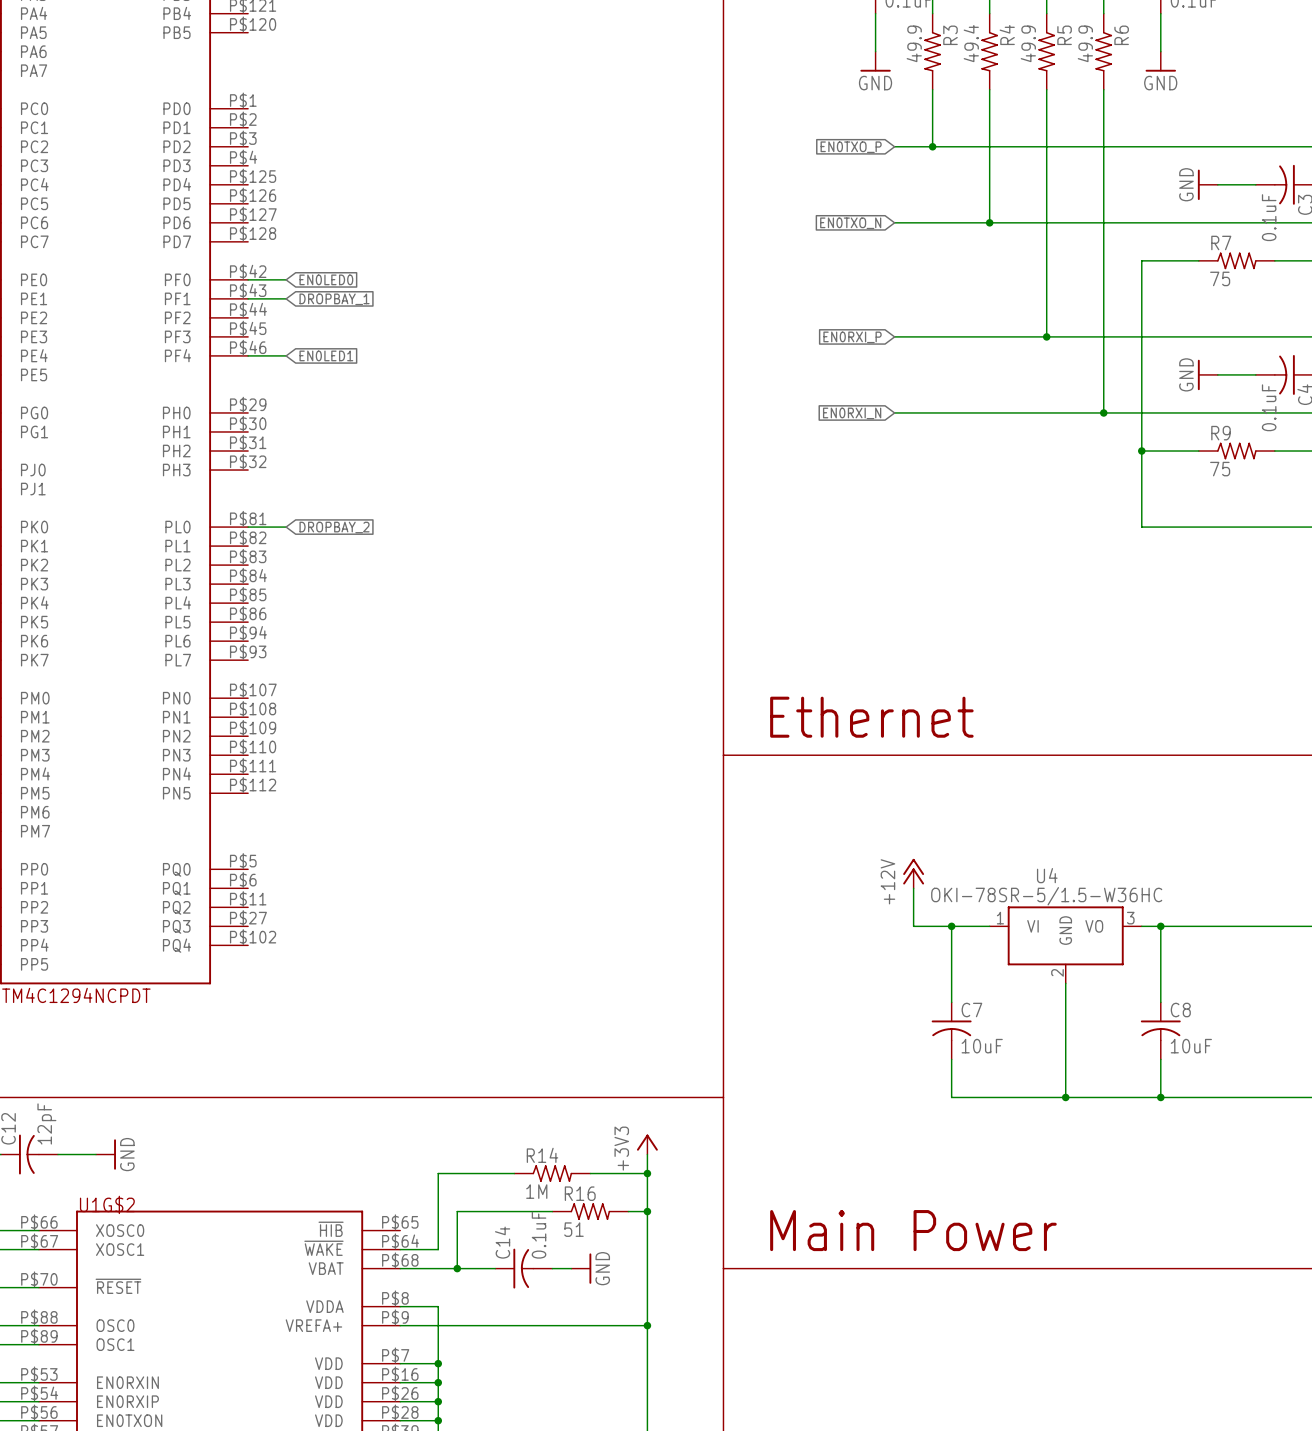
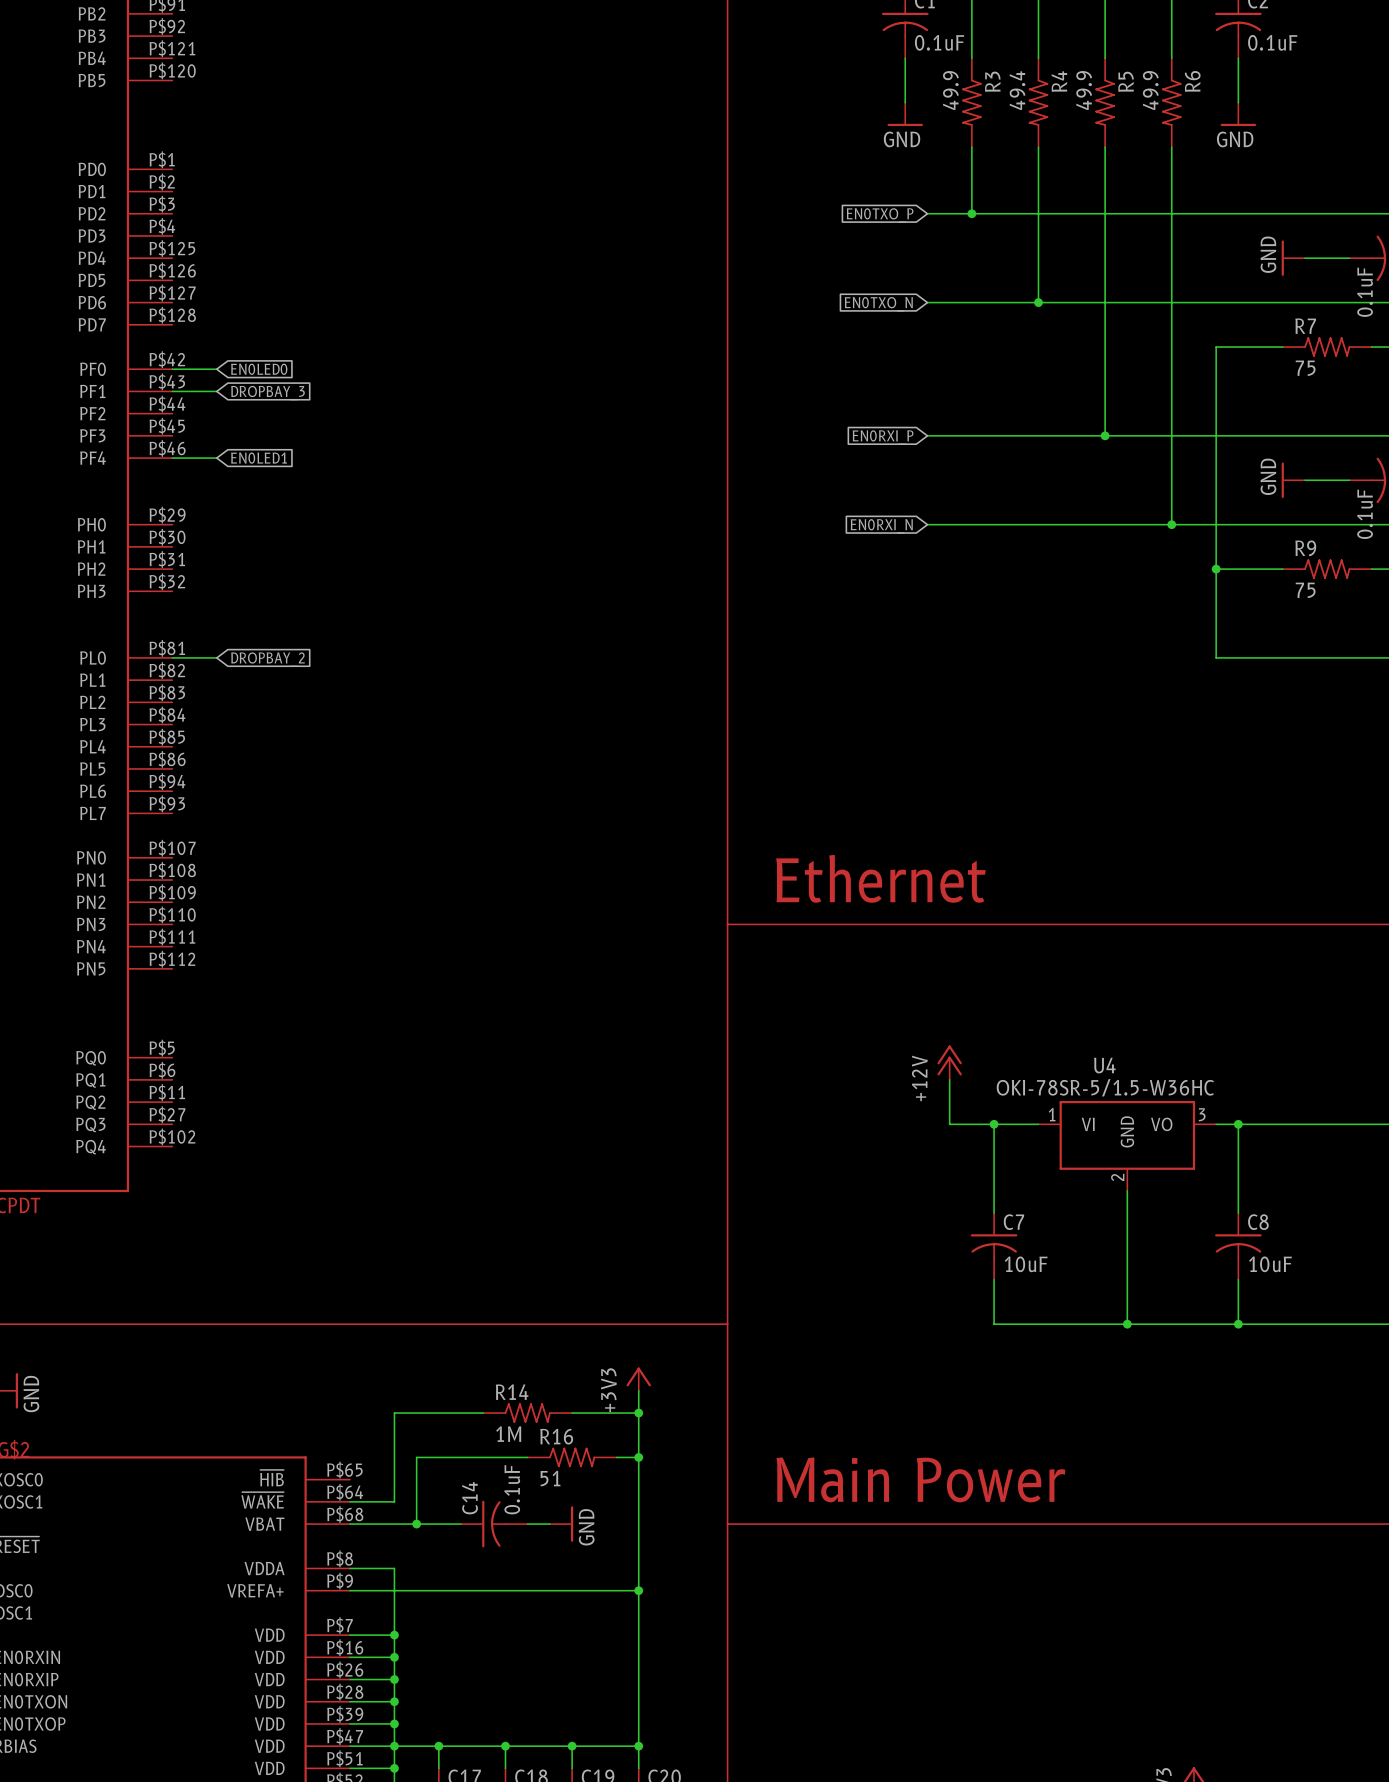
global label: DROPBAY_1 (334, 299) -> DROPBAY_3 (268, 393)

